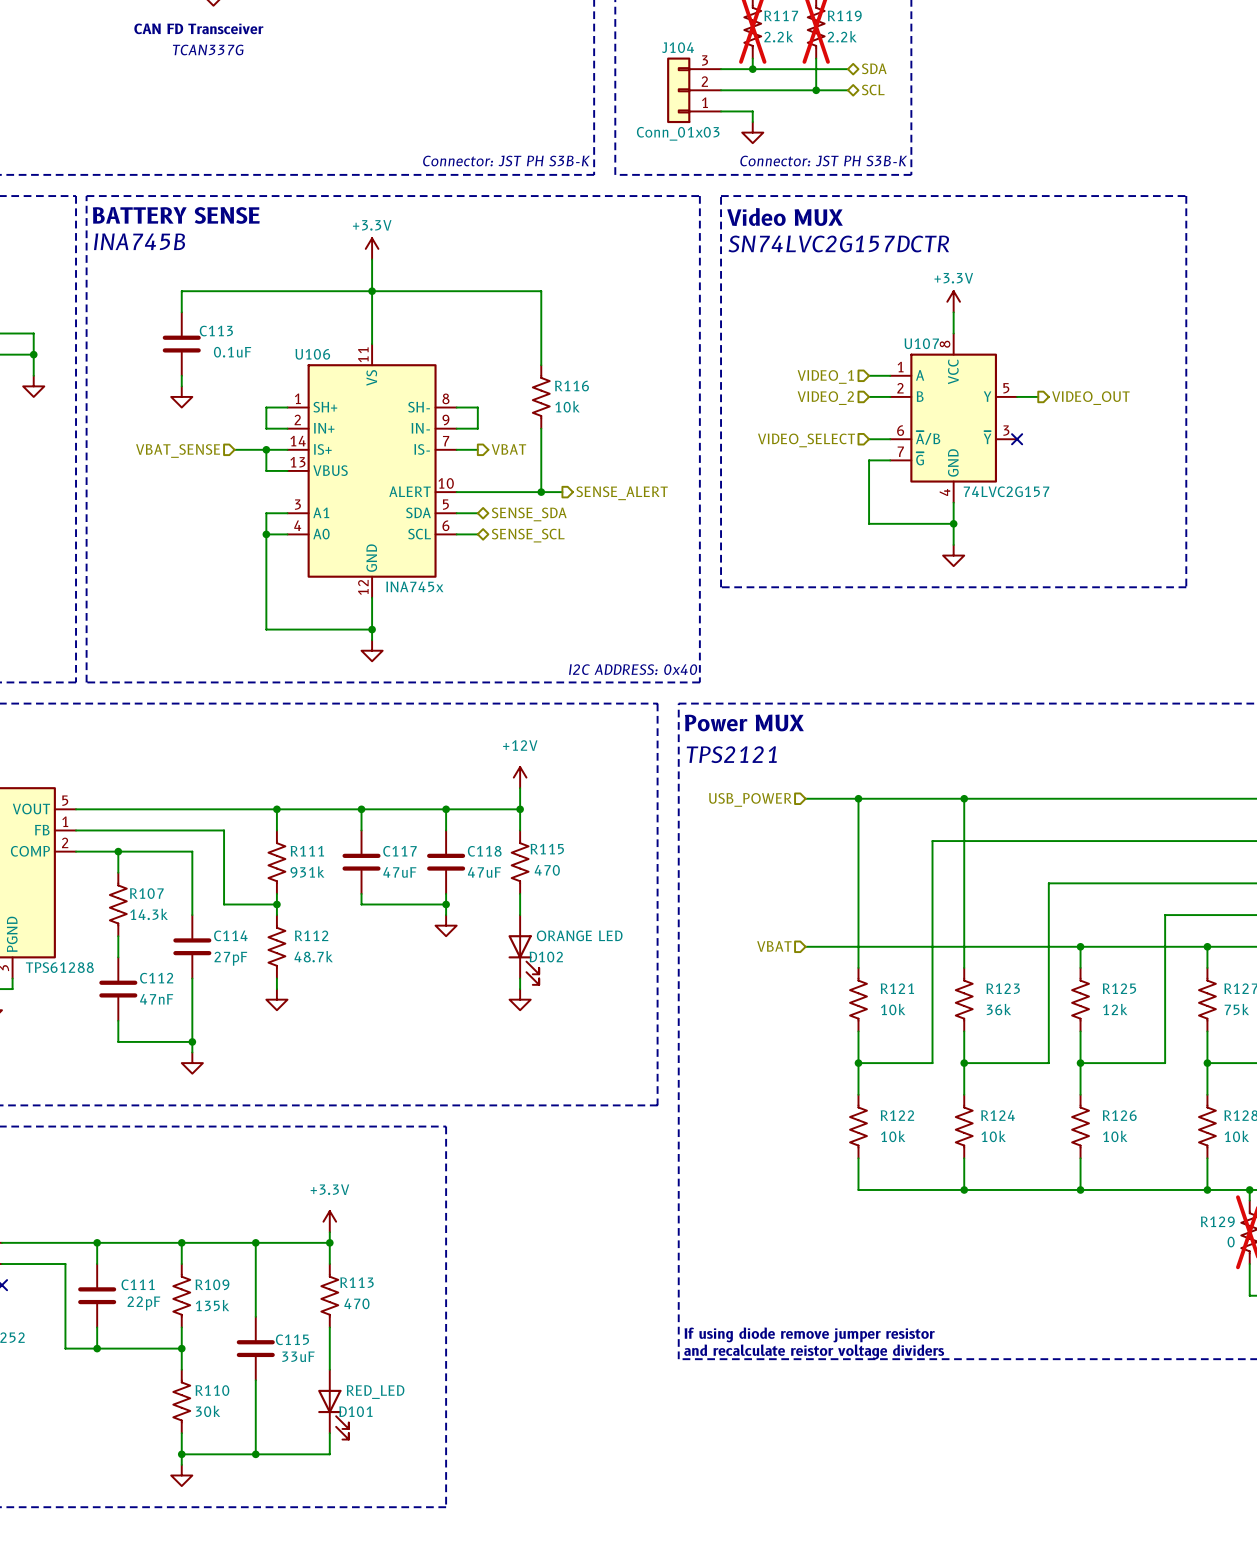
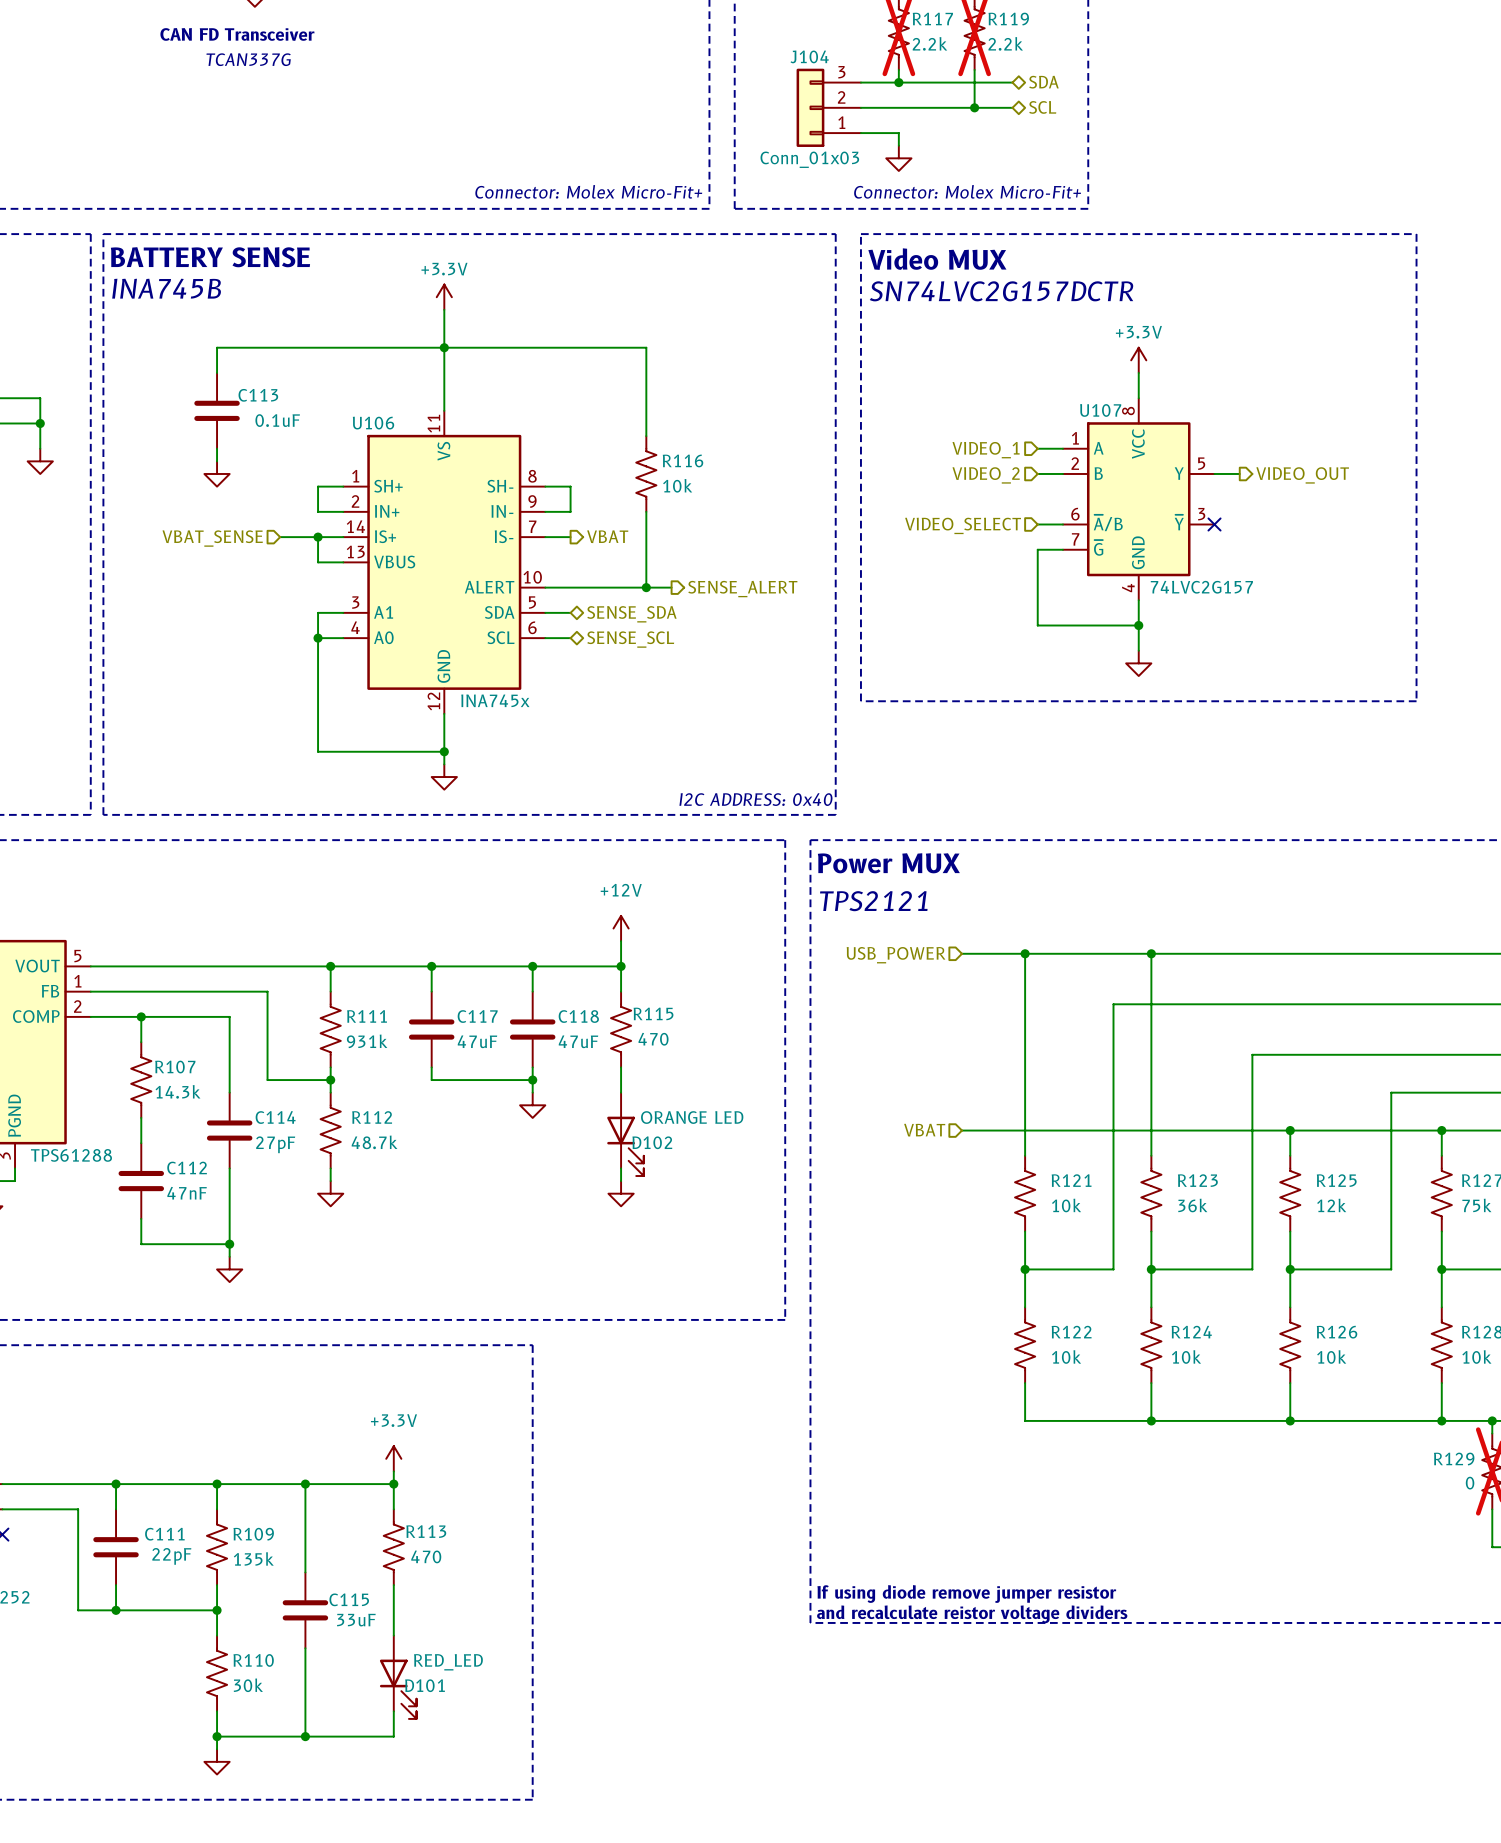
text: Connector: JST PH S3B-K (506, 161) -> Connector: Molex Micro-Fit+ (588, 191)
text: Connector: JST PH S3B-K (823, 161) -> Connector: Molex Micro-Fit+ (967, 191)

